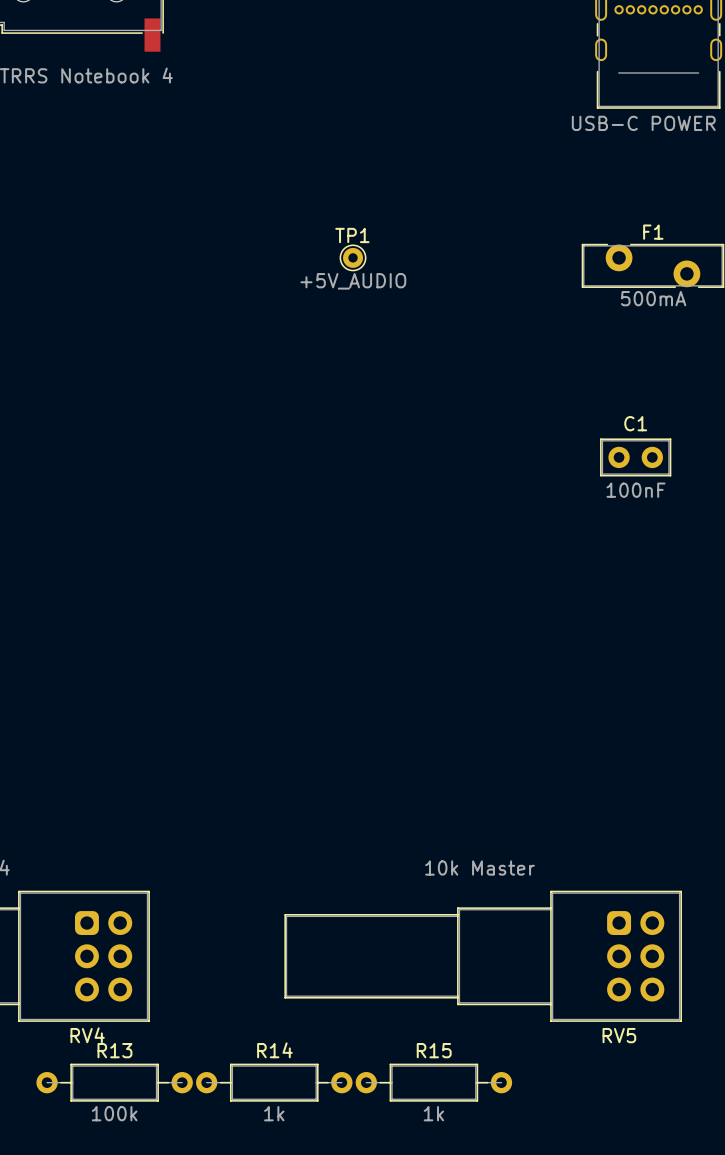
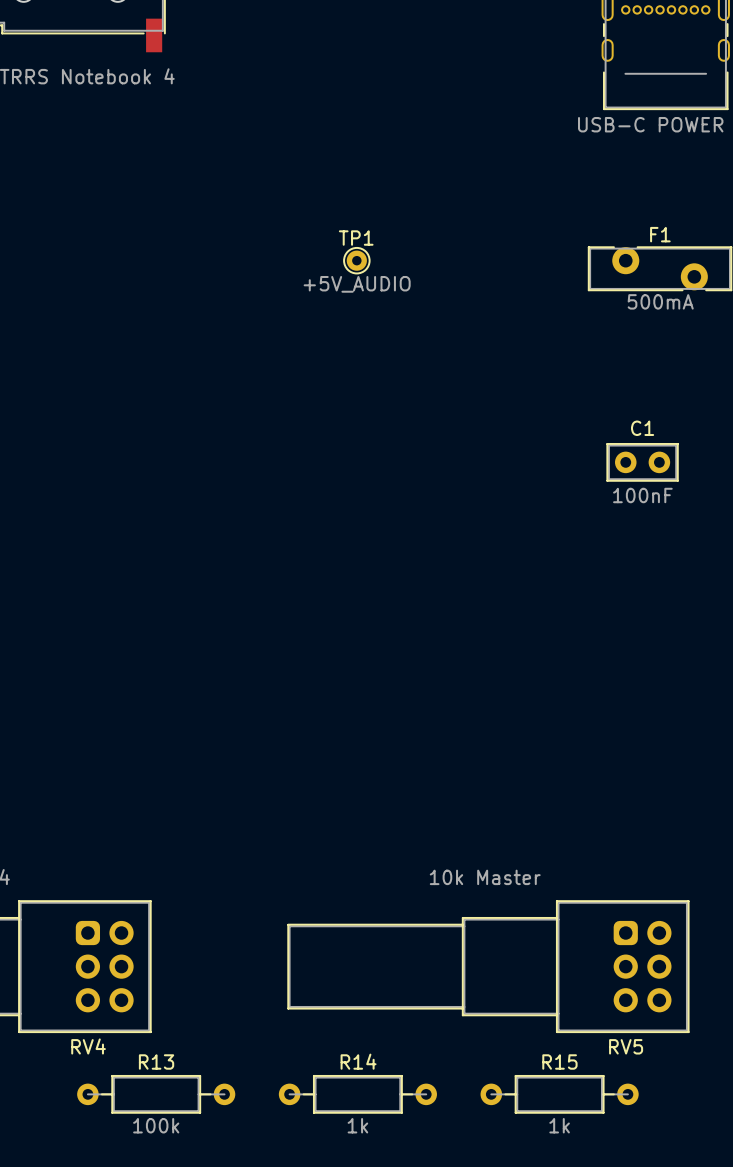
R13 position: (114, 1082) -> (156, 1094)
R14 position: (274, 1082) -> (357, 1094)
R15 position: (433, 1082) -> (559, 1094)

